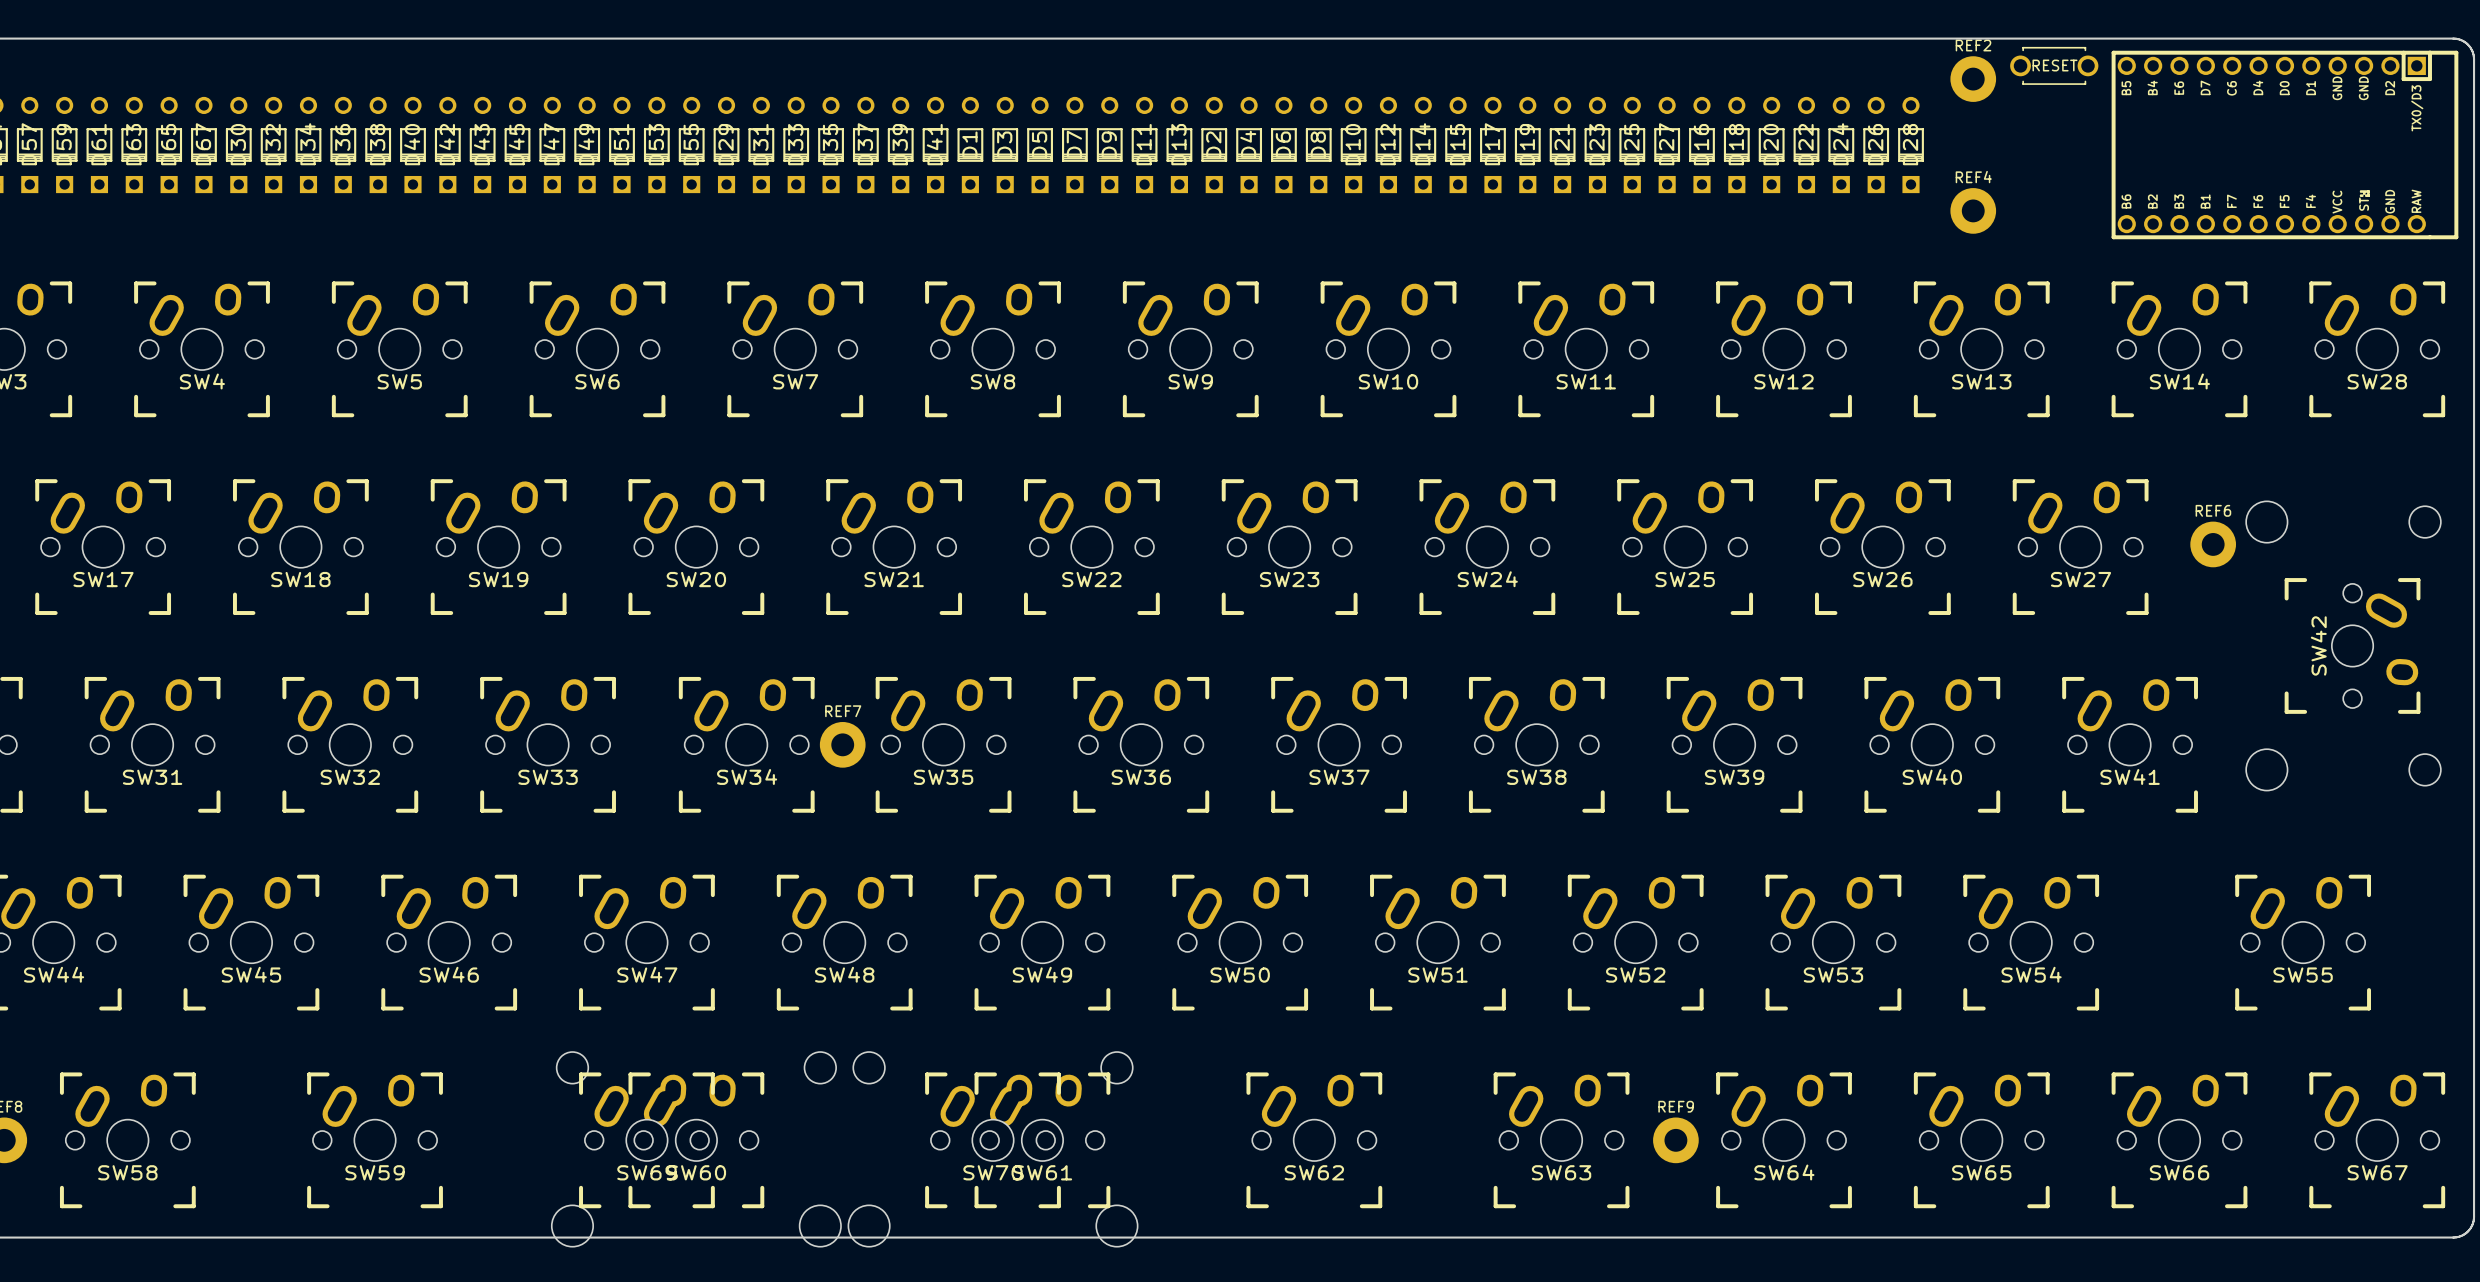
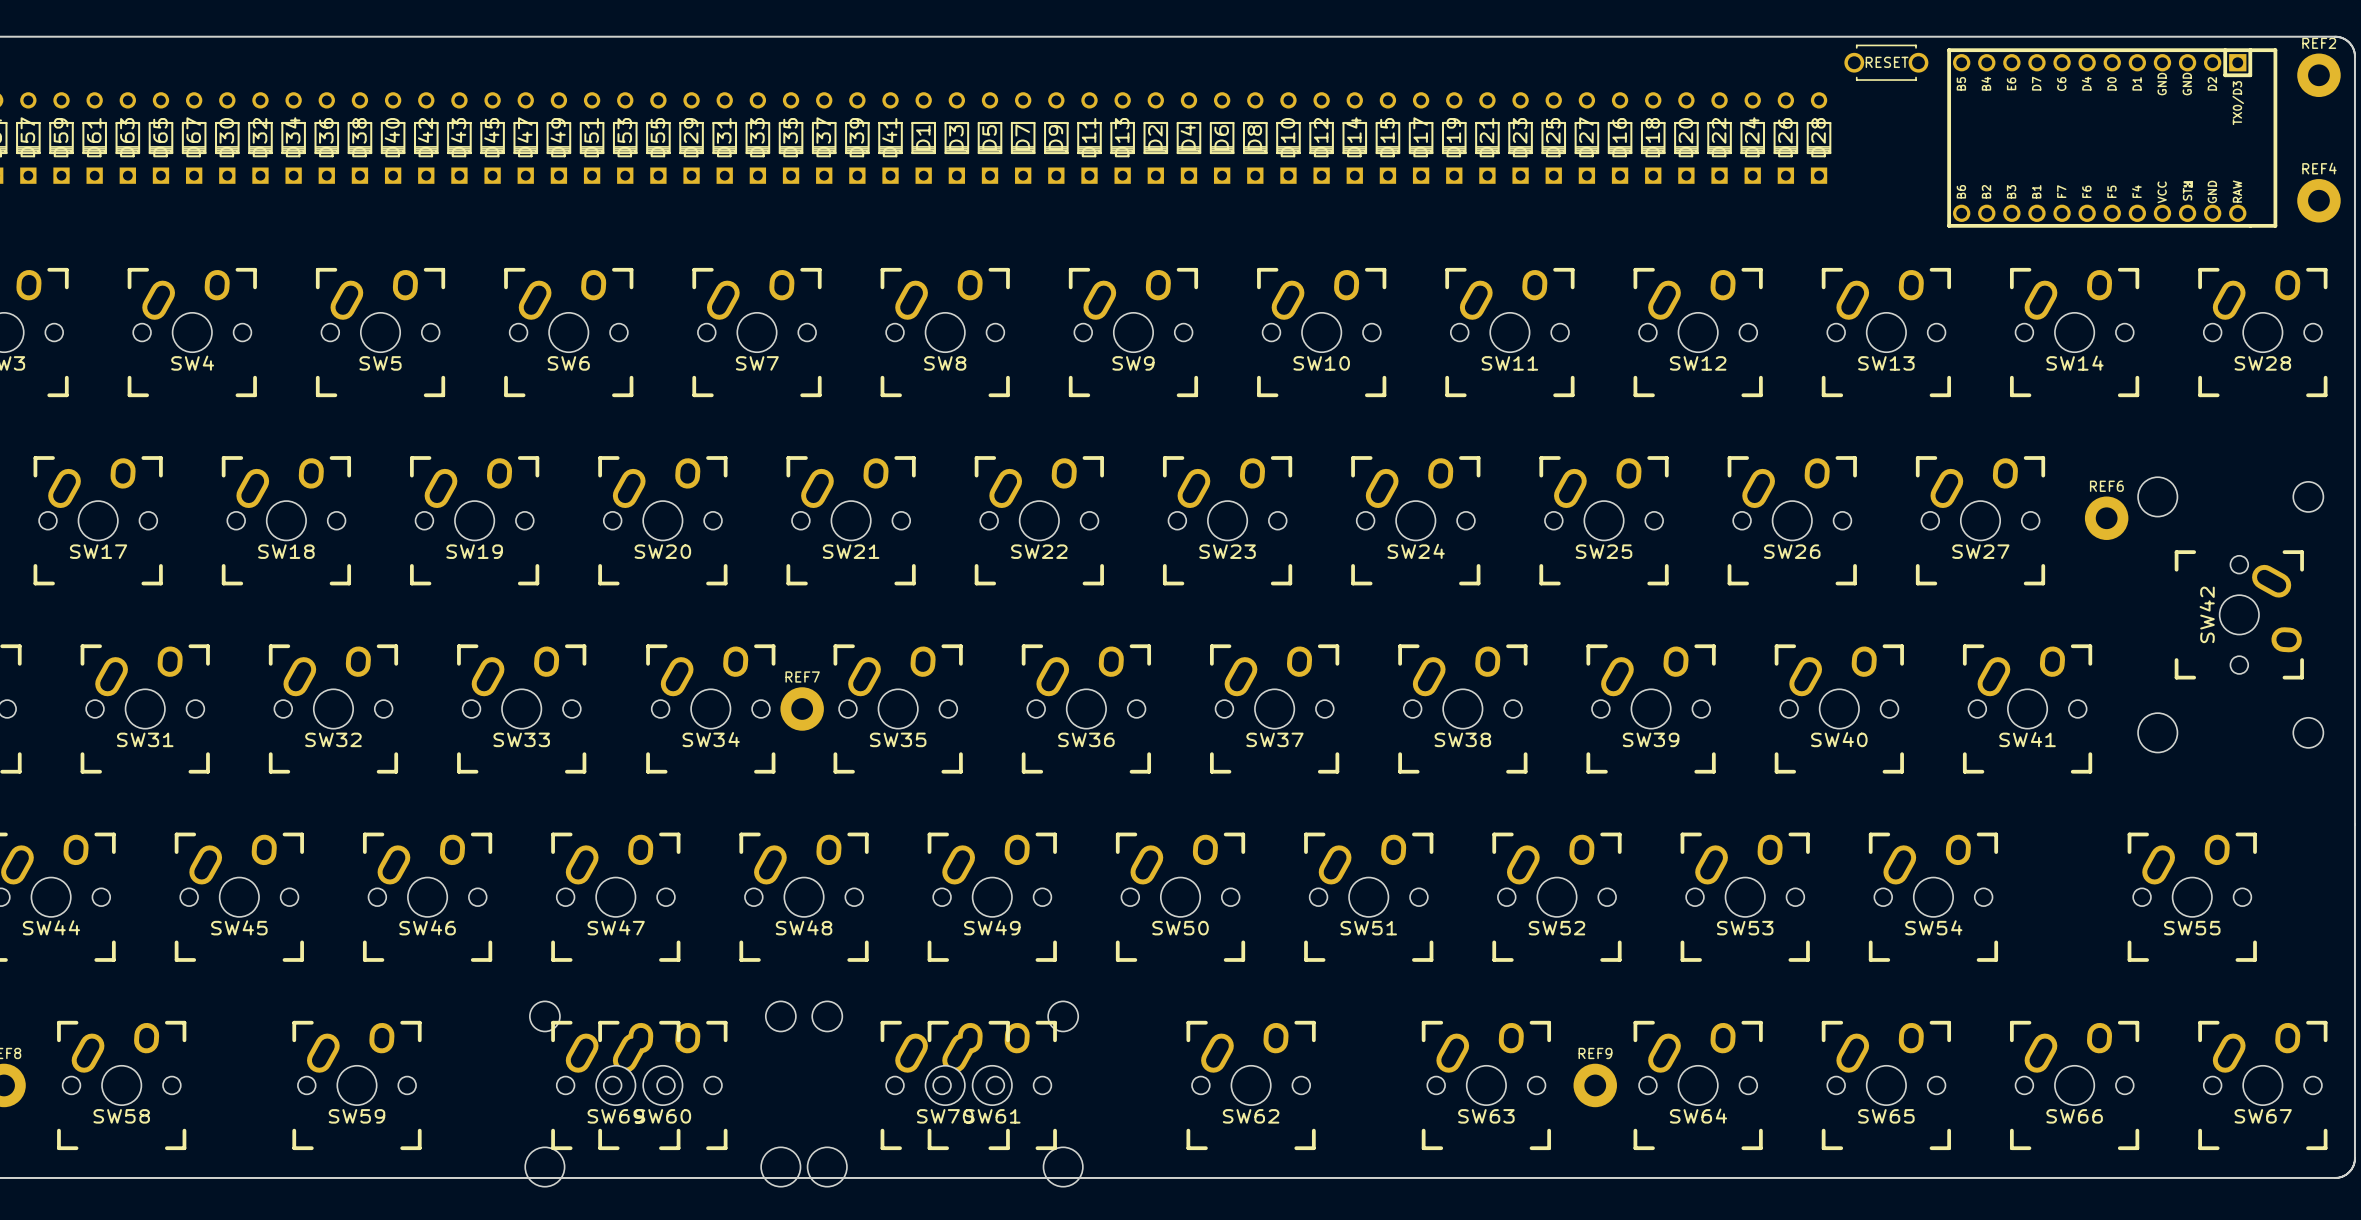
part position: (2054, 65) -> (1886, 62)
REF2 position: (1973, 79) -> (2318, 75)
part position: (2284, 144) -> (2112, 138)
REF4 position: (1973, 210) -> (2318, 200)

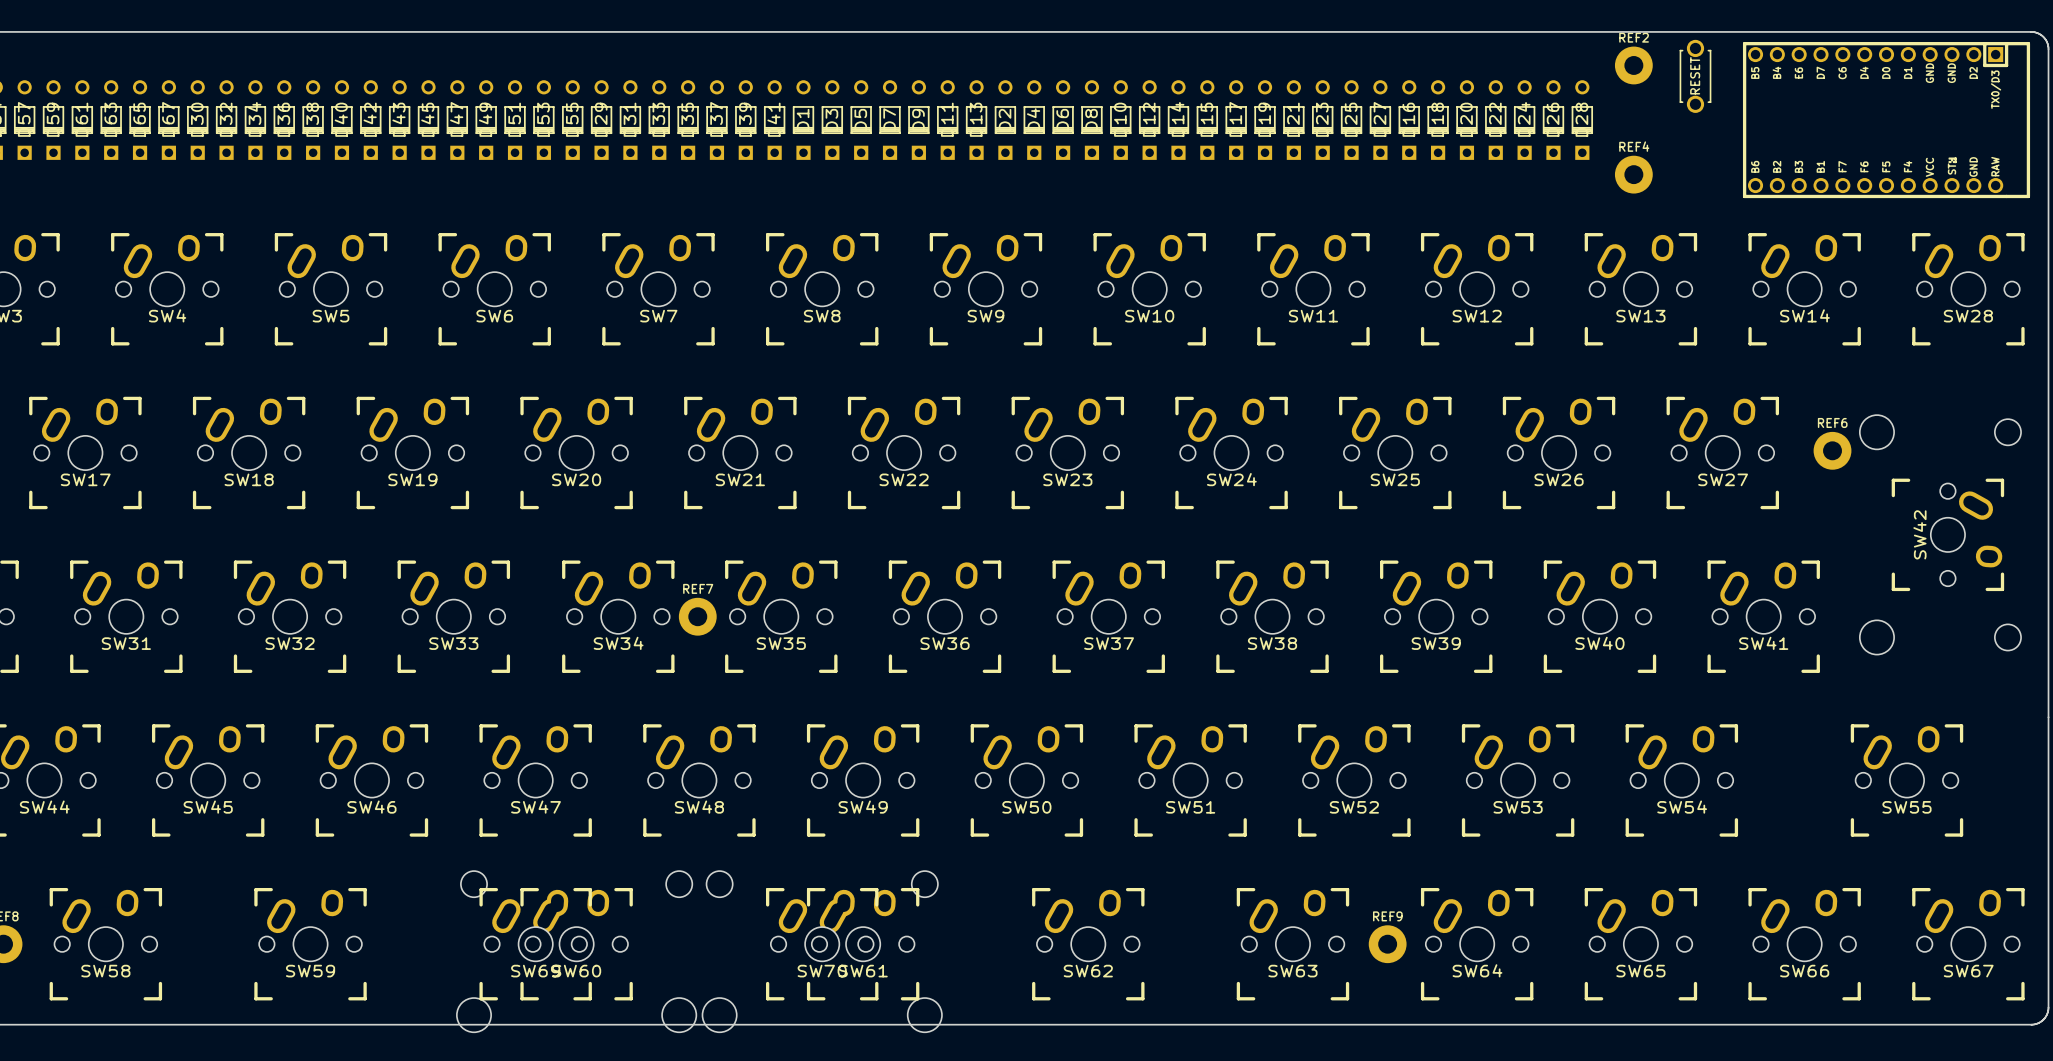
part rotation: 0° (1886, 62) -> 90° clockwise (1695, 76)
part position: (1886, 62) -> (1695, 76)
REF2 position: (2318, 75) -> (1633, 65)
part position: (2112, 138) -> (1886, 120)
REF4 position: (2318, 200) -> (1633, 174)

